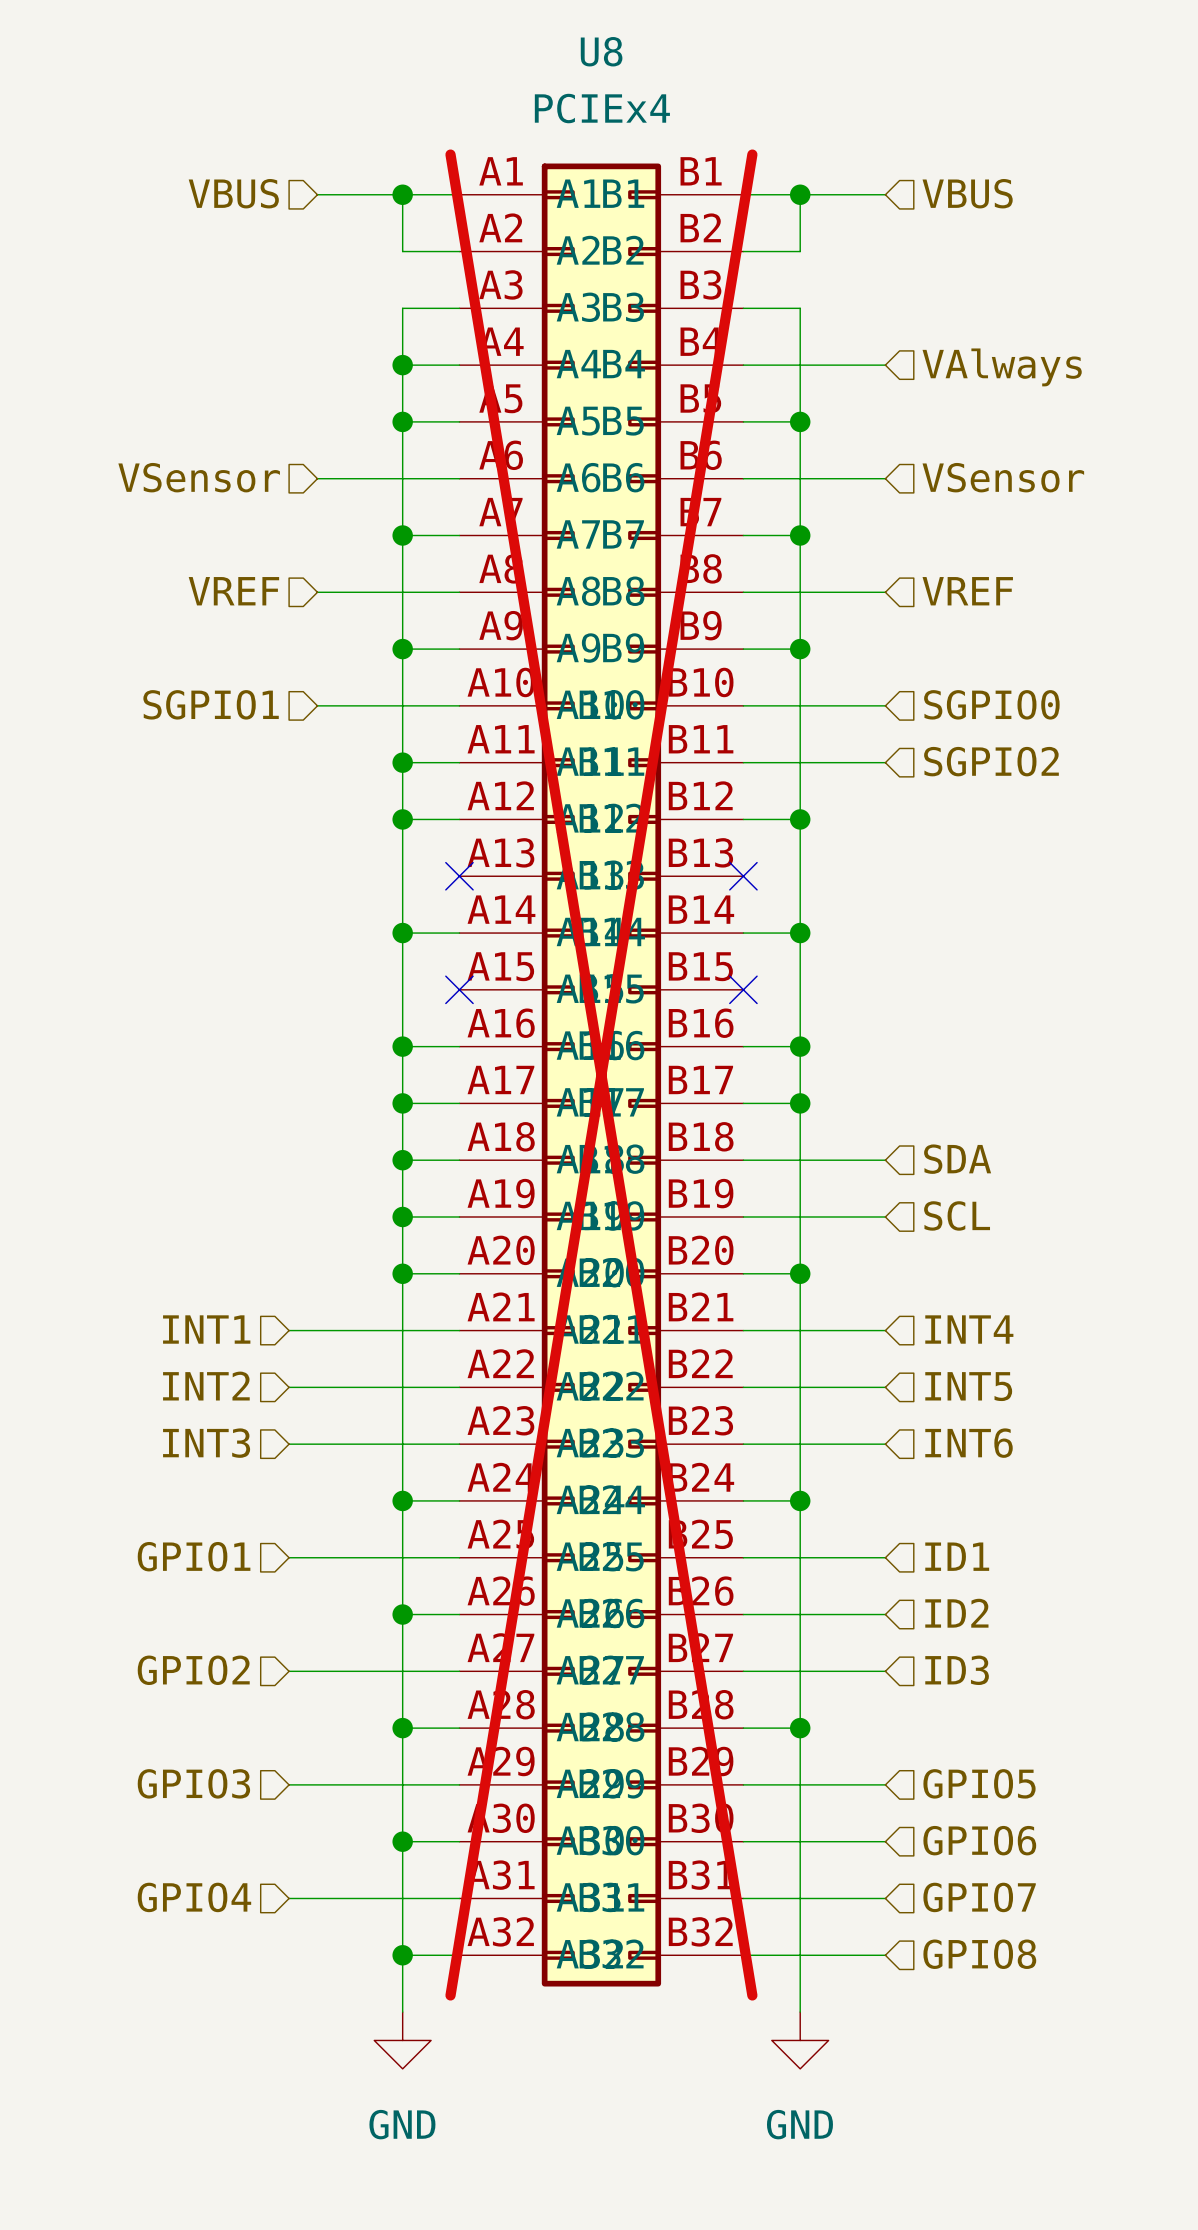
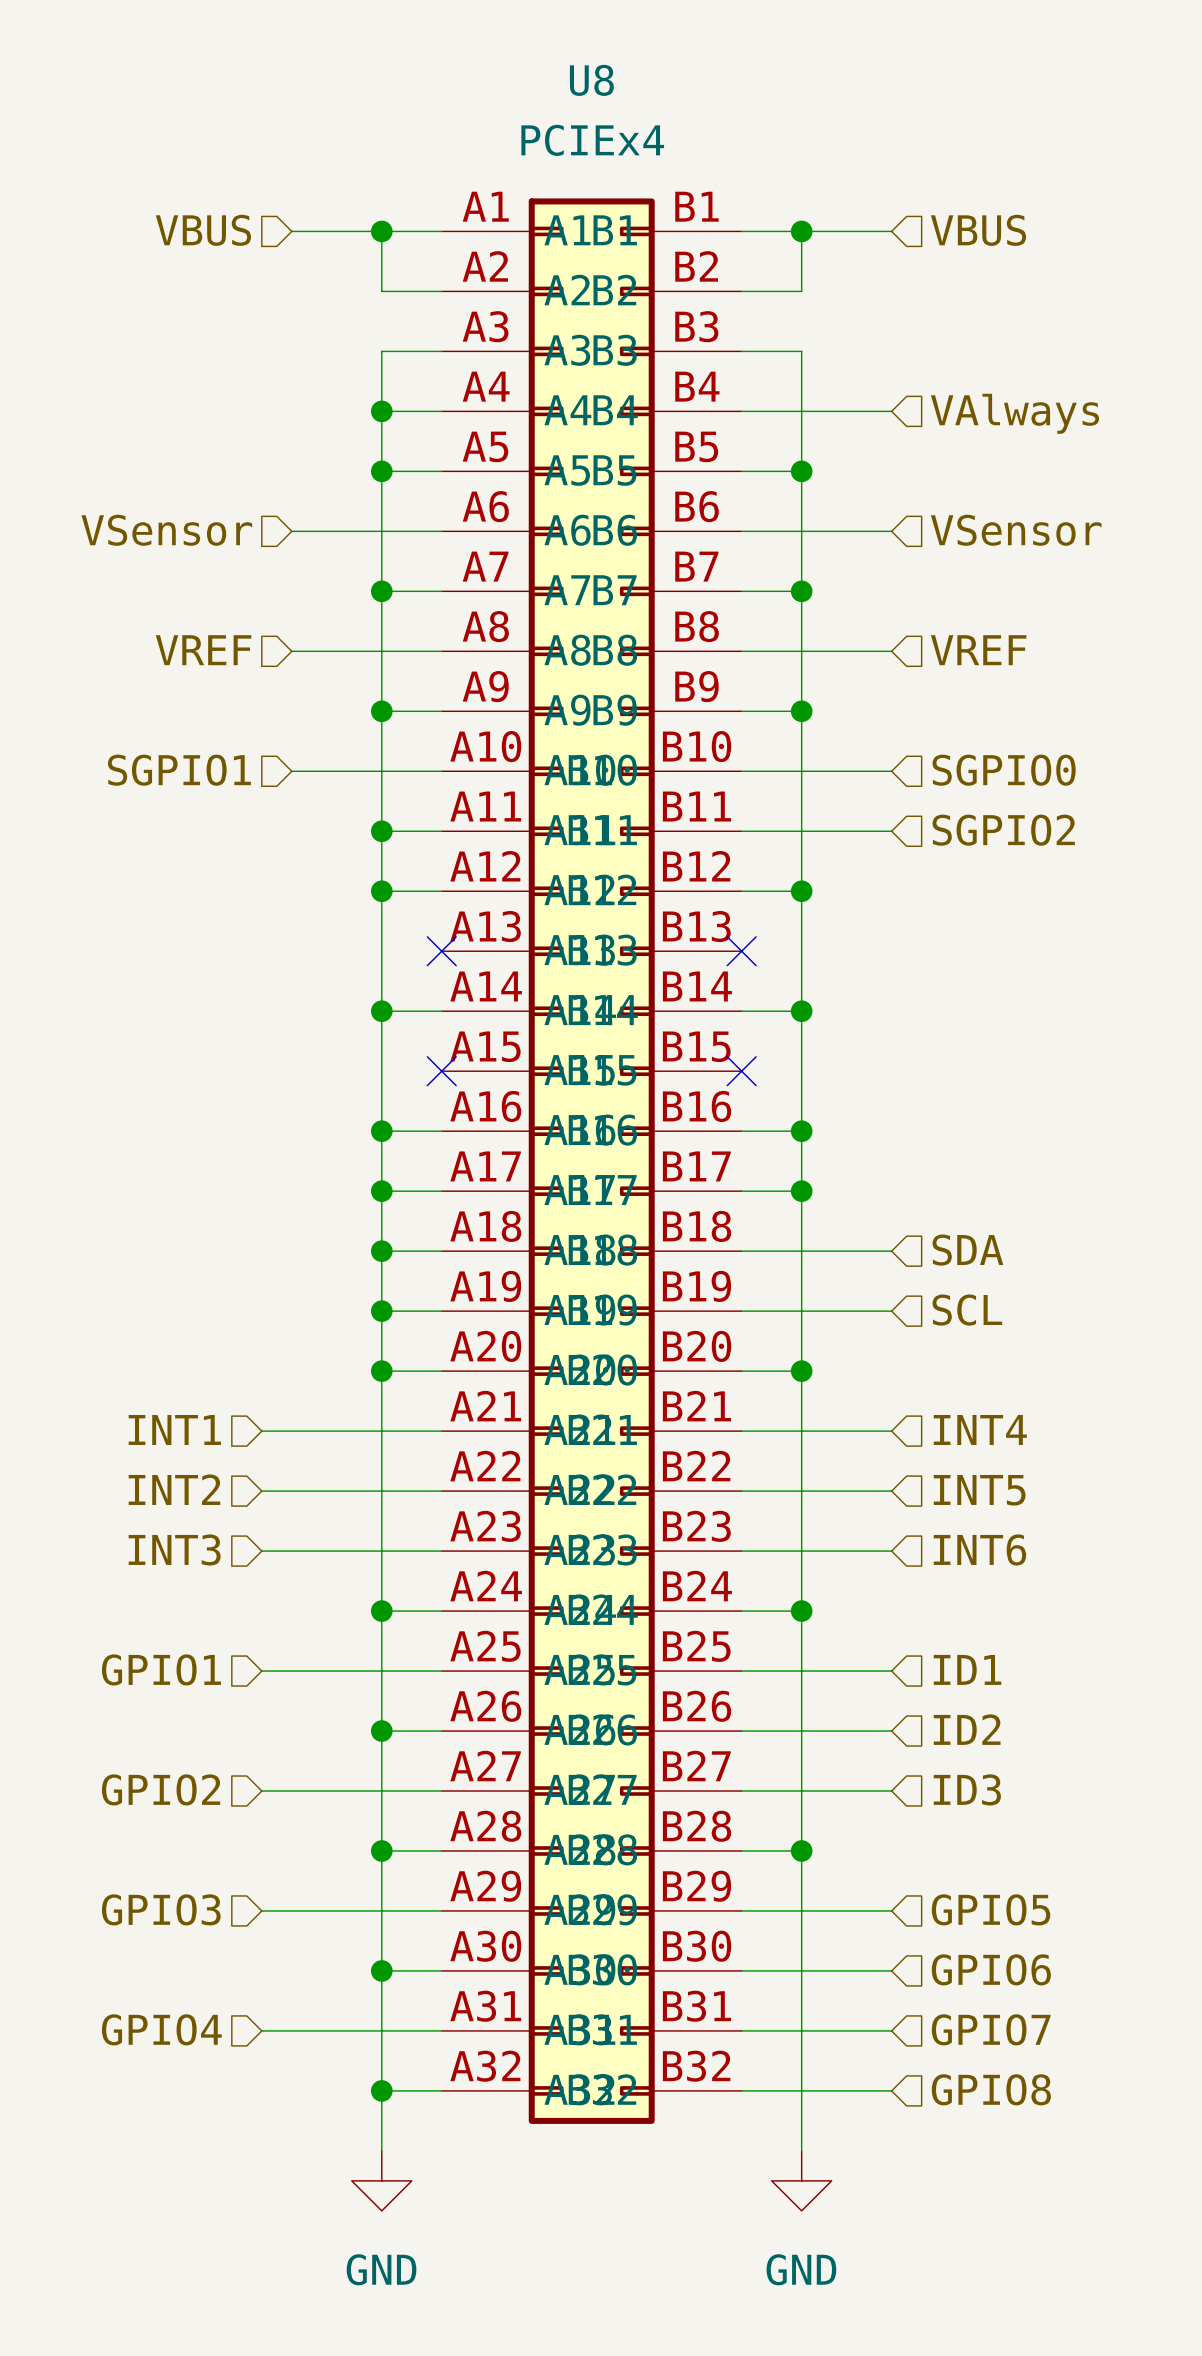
U8 do-not-place cross: (601, 1075) -> none

